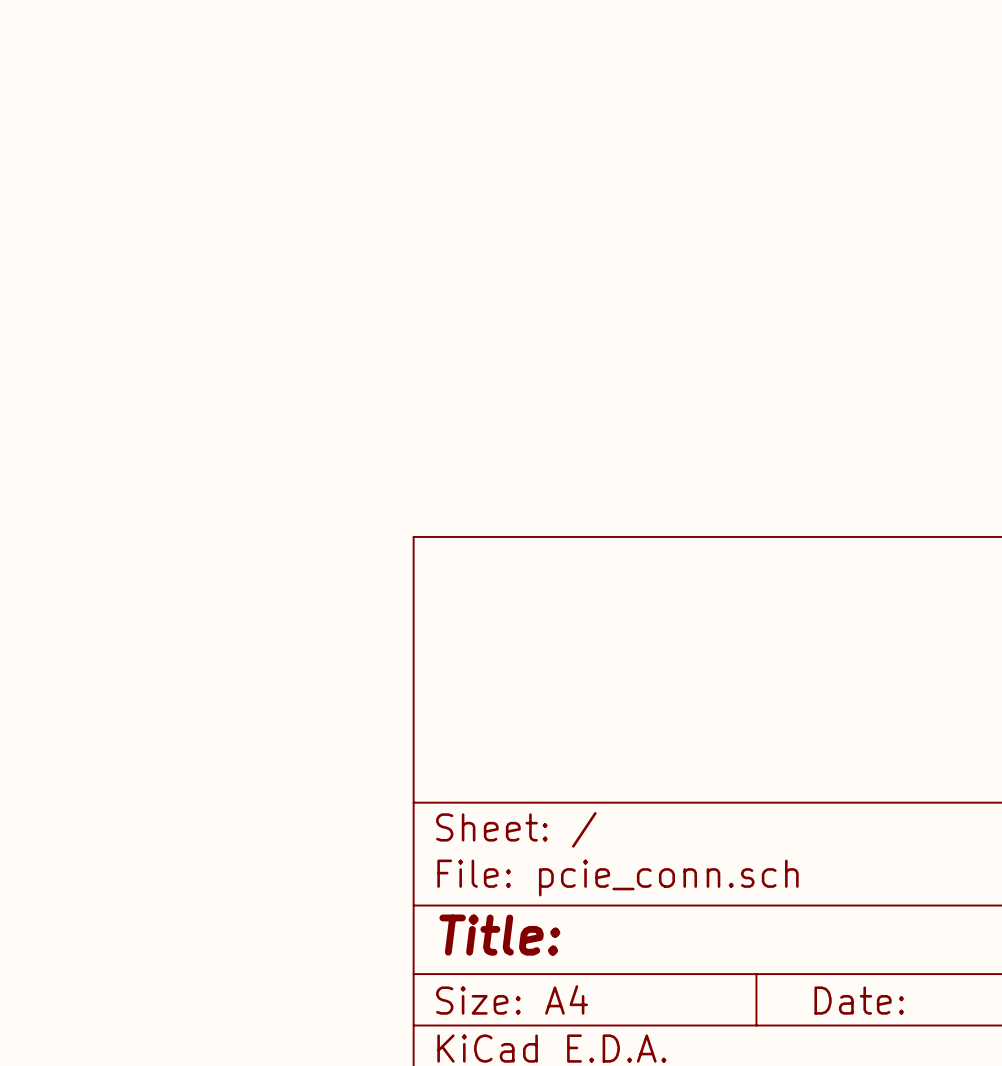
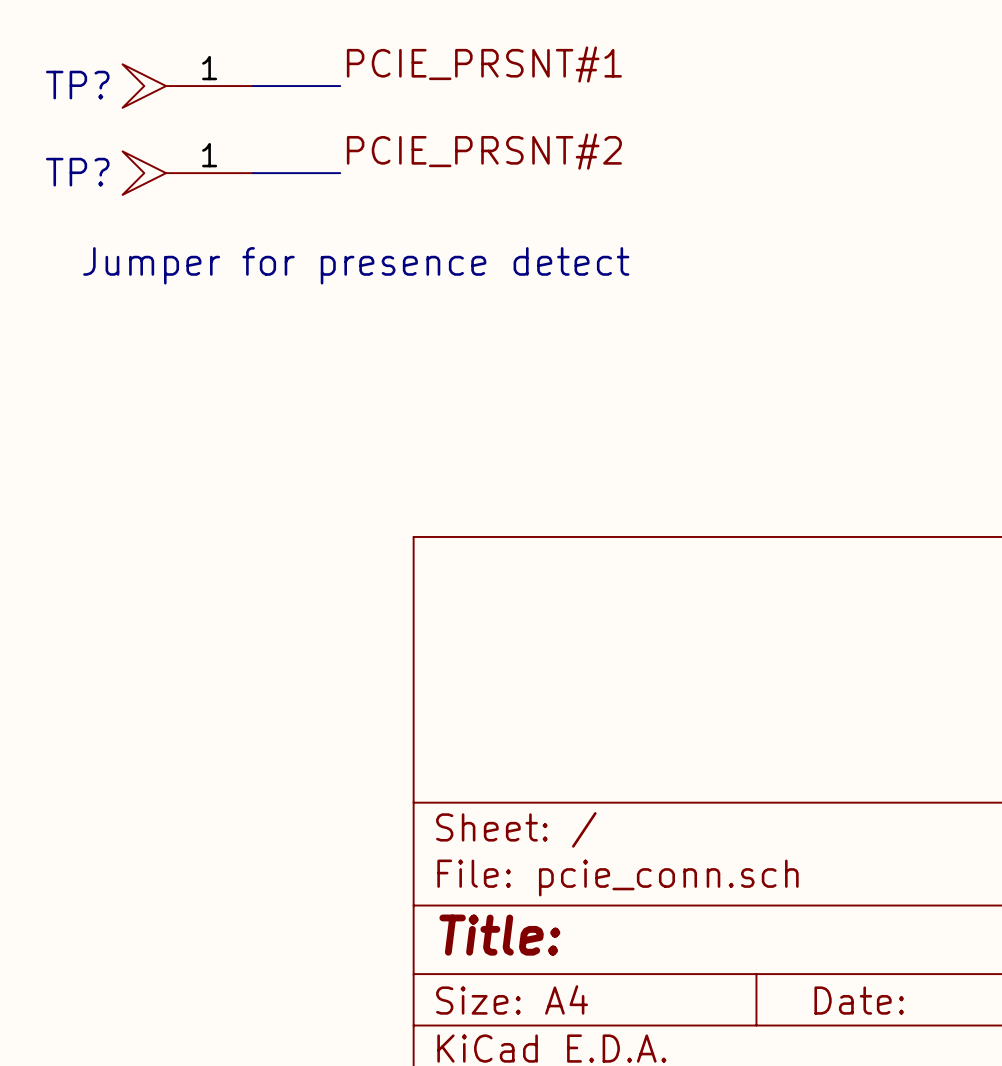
label: none -> PCIE_PRSNT#1 (484, 64)
TP?: none -> (187, 86)
wire: none -> (253, 86) (340, 86)
label: none -> PCIE_PRSNT#2 (484, 151)
TP?: none -> (187, 173)
wire: none -> (253, 173) (340, 173)
text: none -> Jumper for presence detect (356, 265)

